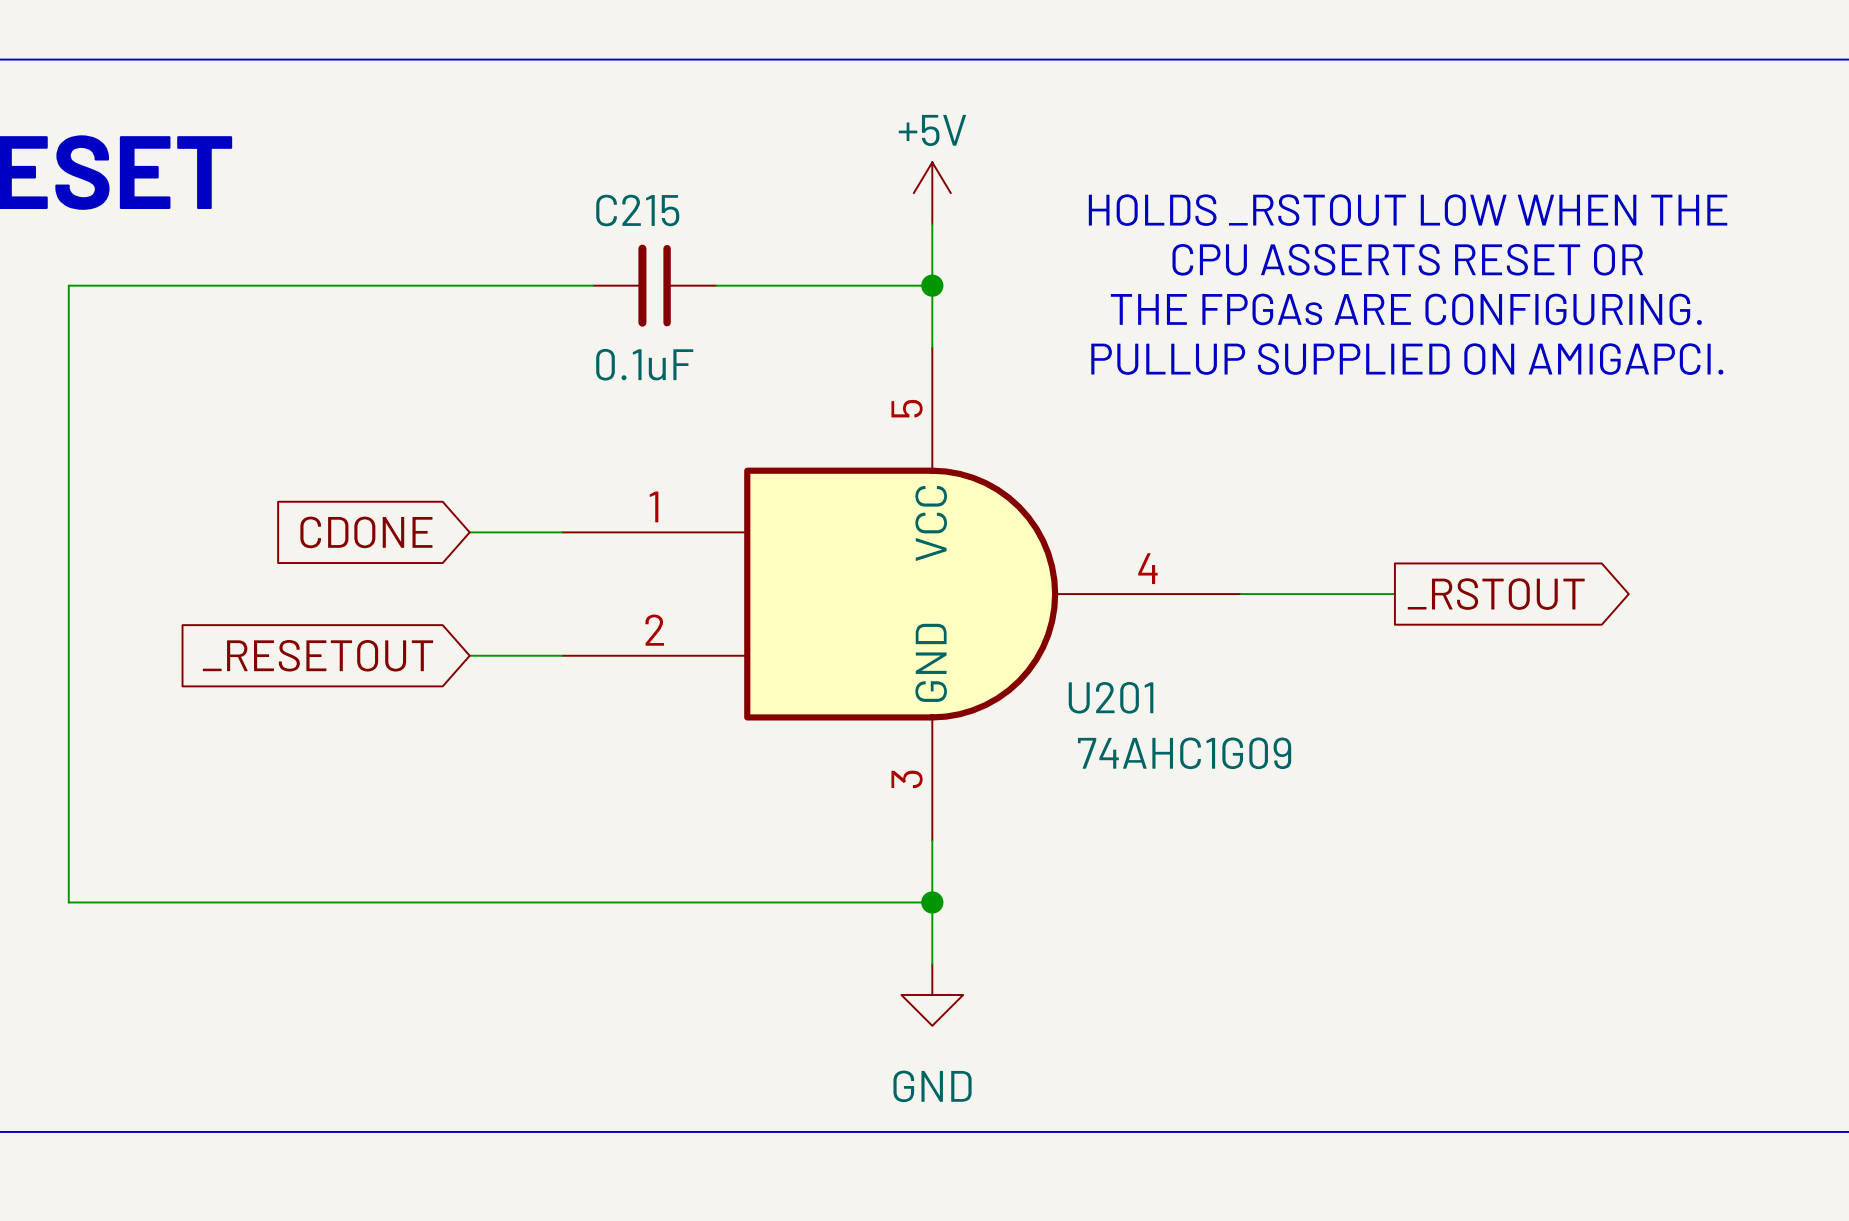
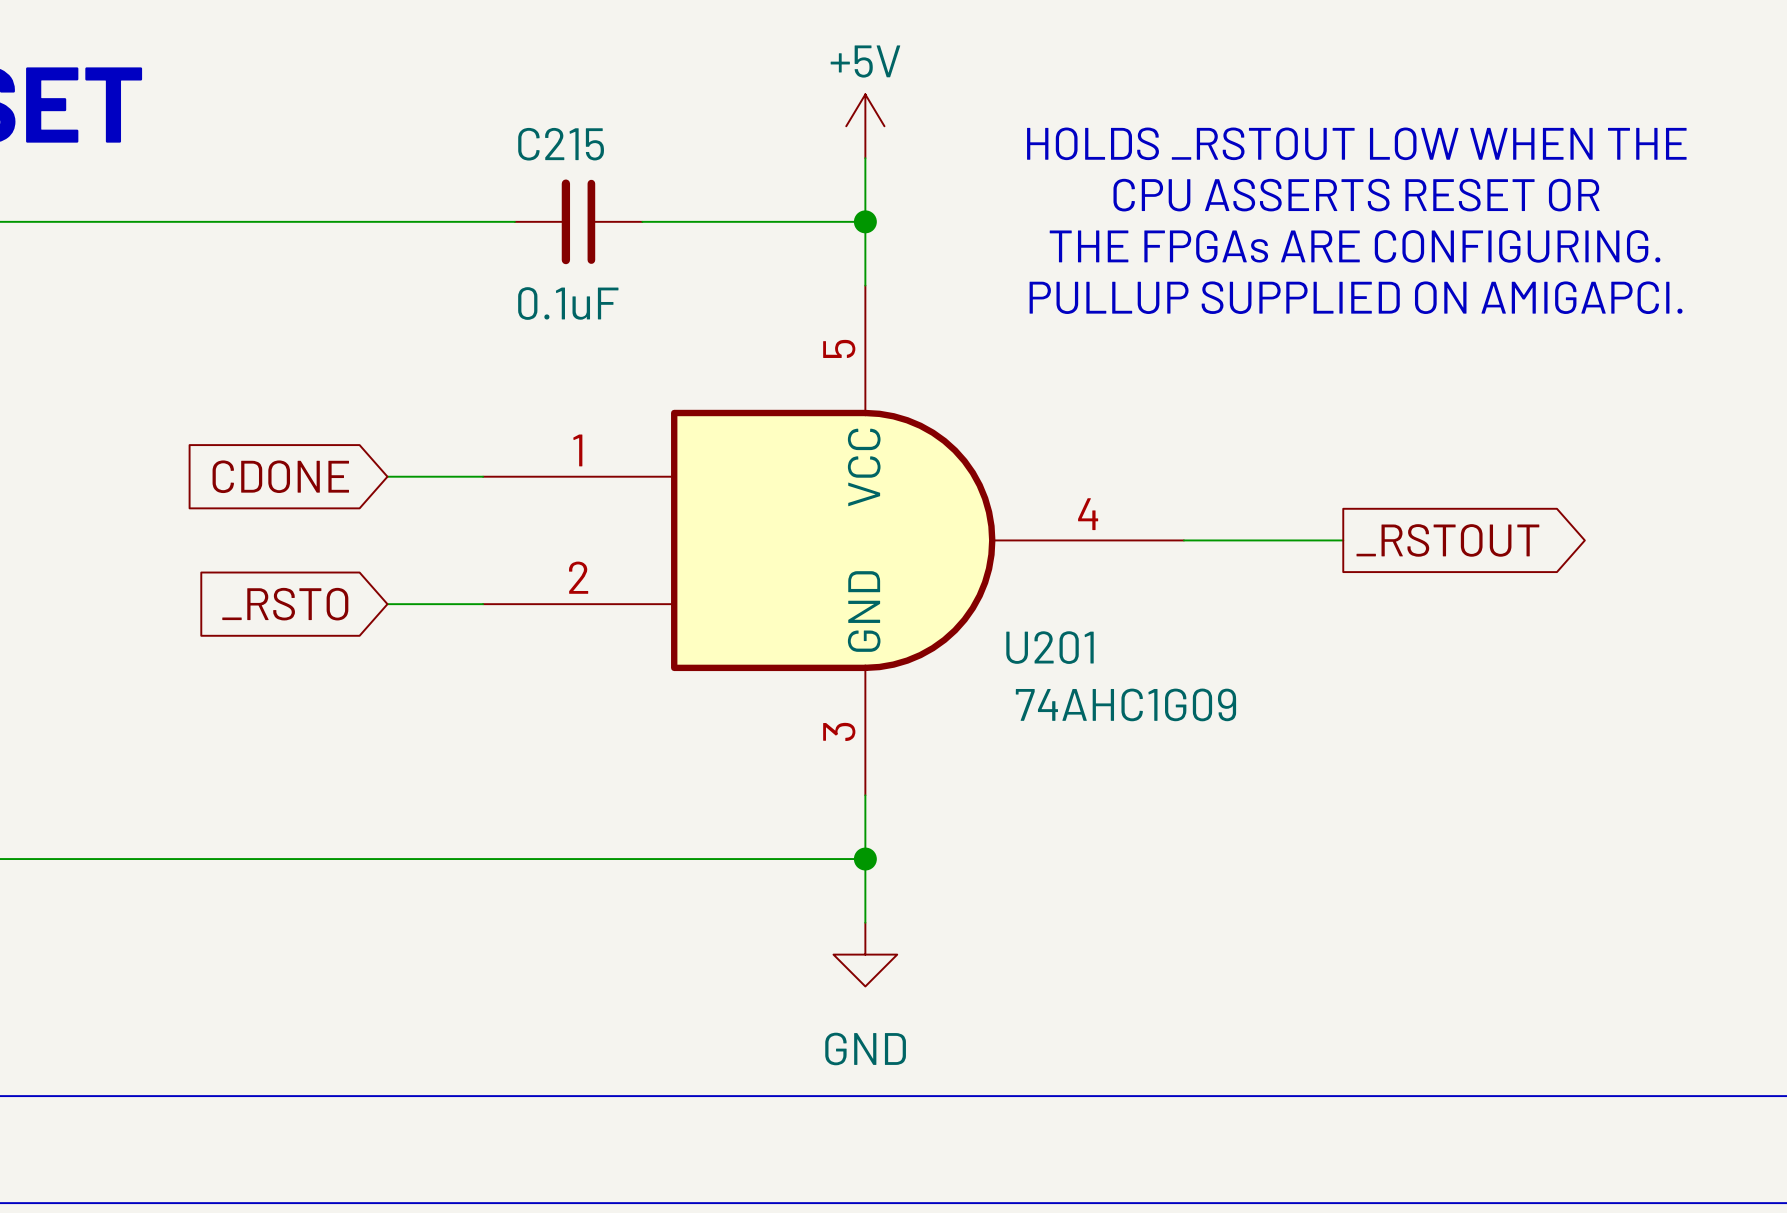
global label: _RESETOUT (317, 655) -> _RSTO (285, 604)

